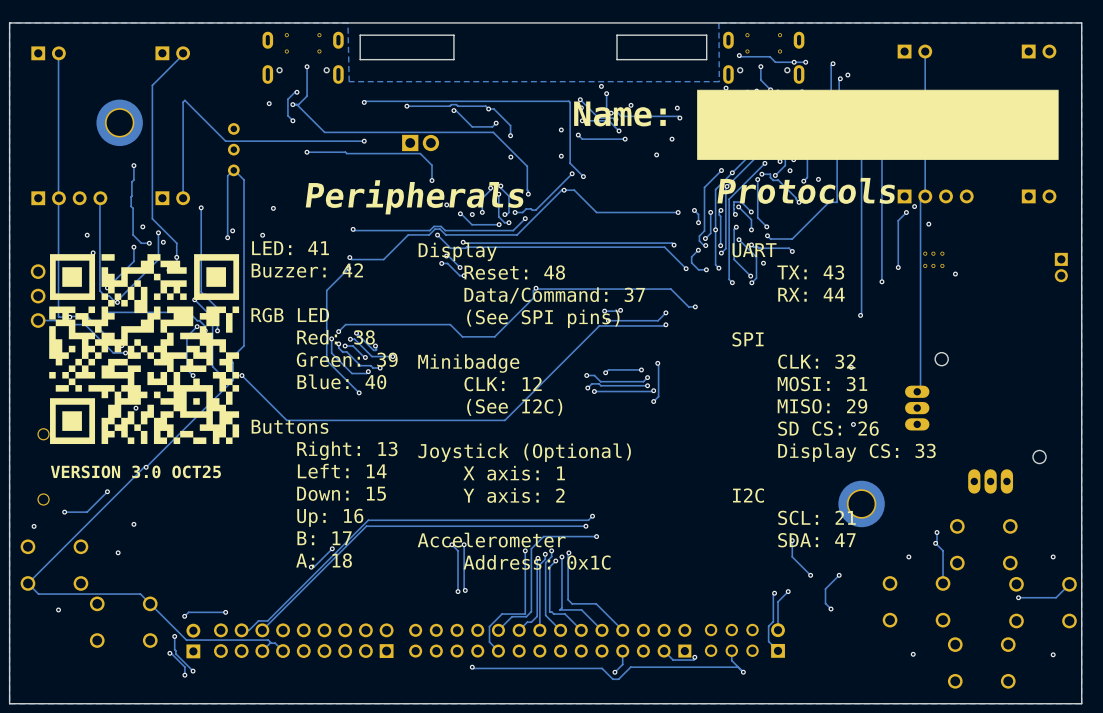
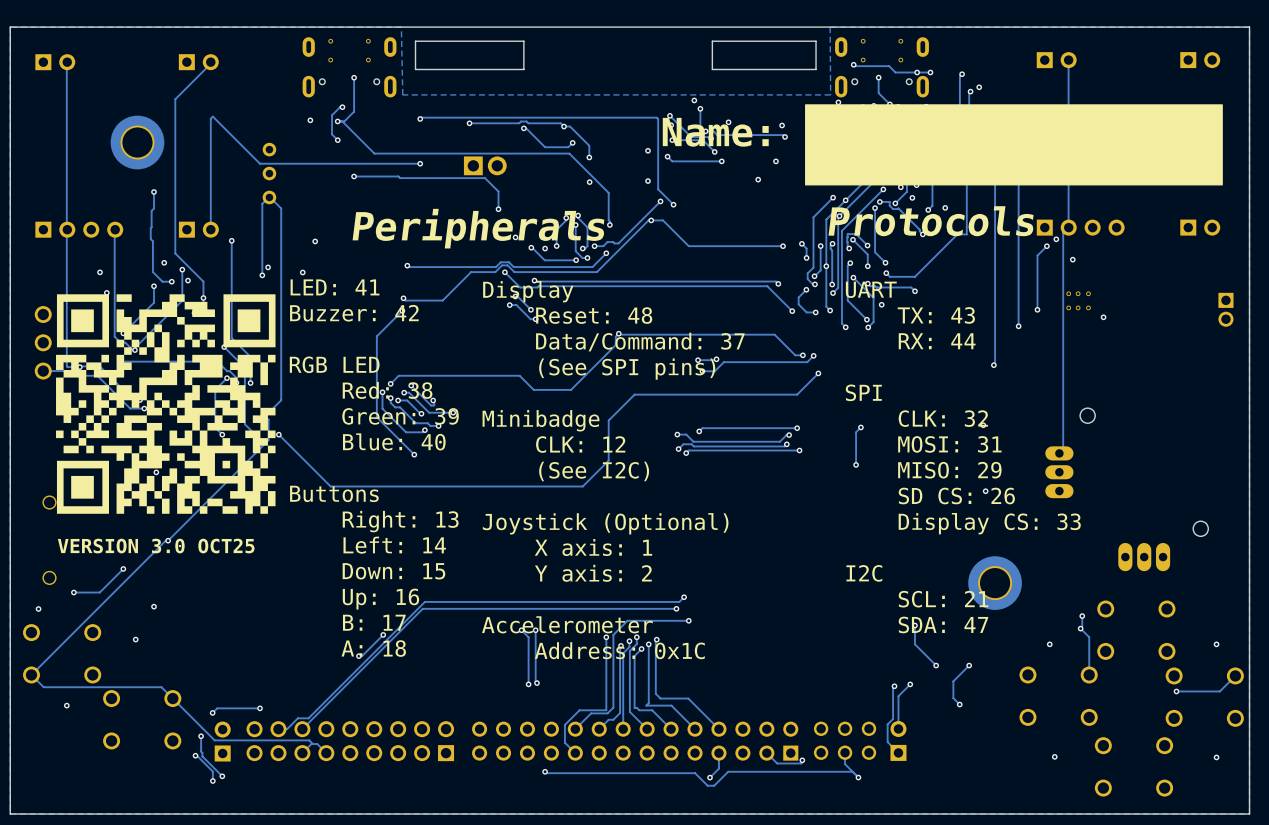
via: none -> (813, 355)
track: (665, 312) (658, 320) (619, 320) -> (813, 355) (807, 362) (723, 362) (714, 371)
via: (665, 312) -> none
via: none -> (818, 373)
track: (665, 324) (599, 325) (527, 397) -> (818, 373) (797, 394) (634, 394) (608, 420) (608, 460)
via: (665, 324) -> none
track: (657, 363) (658, 396) (653, 401) -> none
via: (657, 363) -> none
via: (641, 369) -> none
track: none -> (797, 428) (740, 428)
via: none -> (797, 428)
track: none -> (860, 427) (856, 432) (856, 464)
via: none -> (860, 427)
via: none -> (789, 435)
track: (647, 377) (643, 381) -> (789, 435) (779, 441) (742, 441)
via: (647, 377) -> none
track: none -> (786, 444) (784, 446) (747, 446)
via: none -> (786, 444)
via: (647, 385) -> none
via: none -> (799, 450)
track: (653, 390) (594, 391) -> (799, 450) (688, 450) (686, 453)
via: (653, 390) -> none
via: (653, 401) -> none
via: none -> (856, 464)

